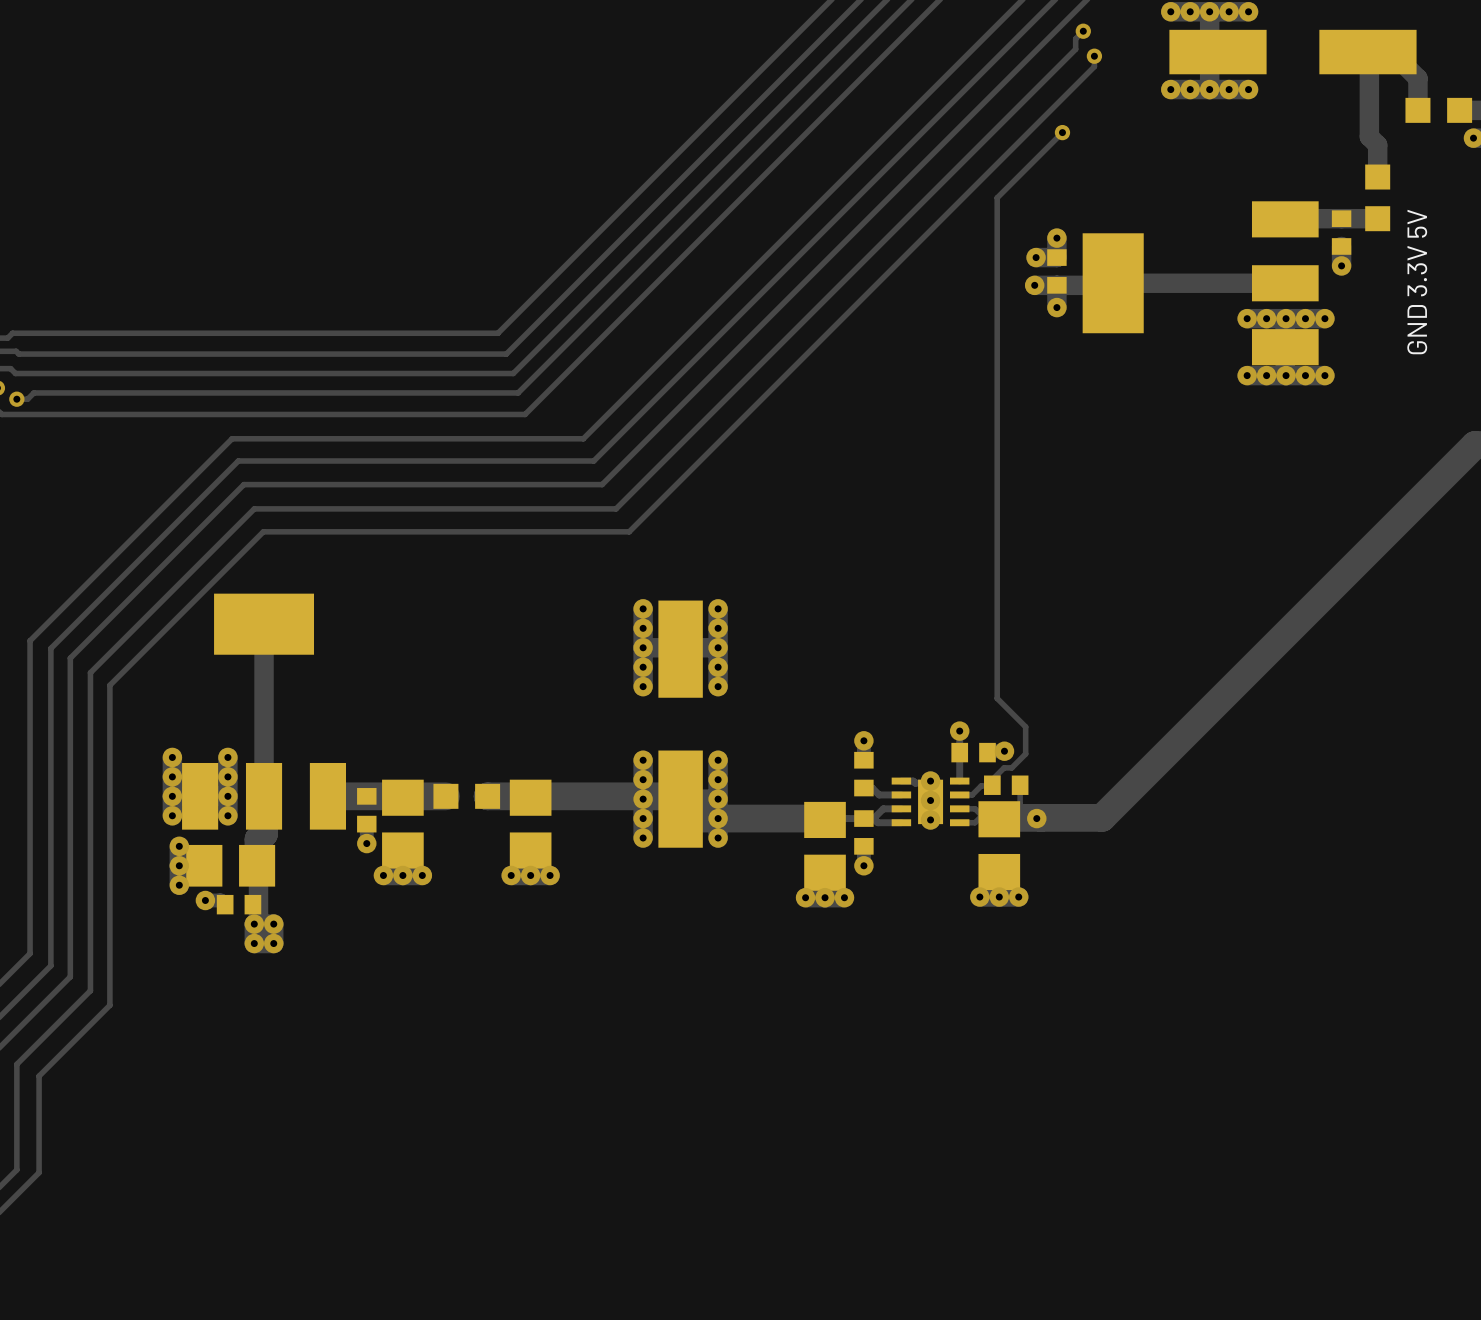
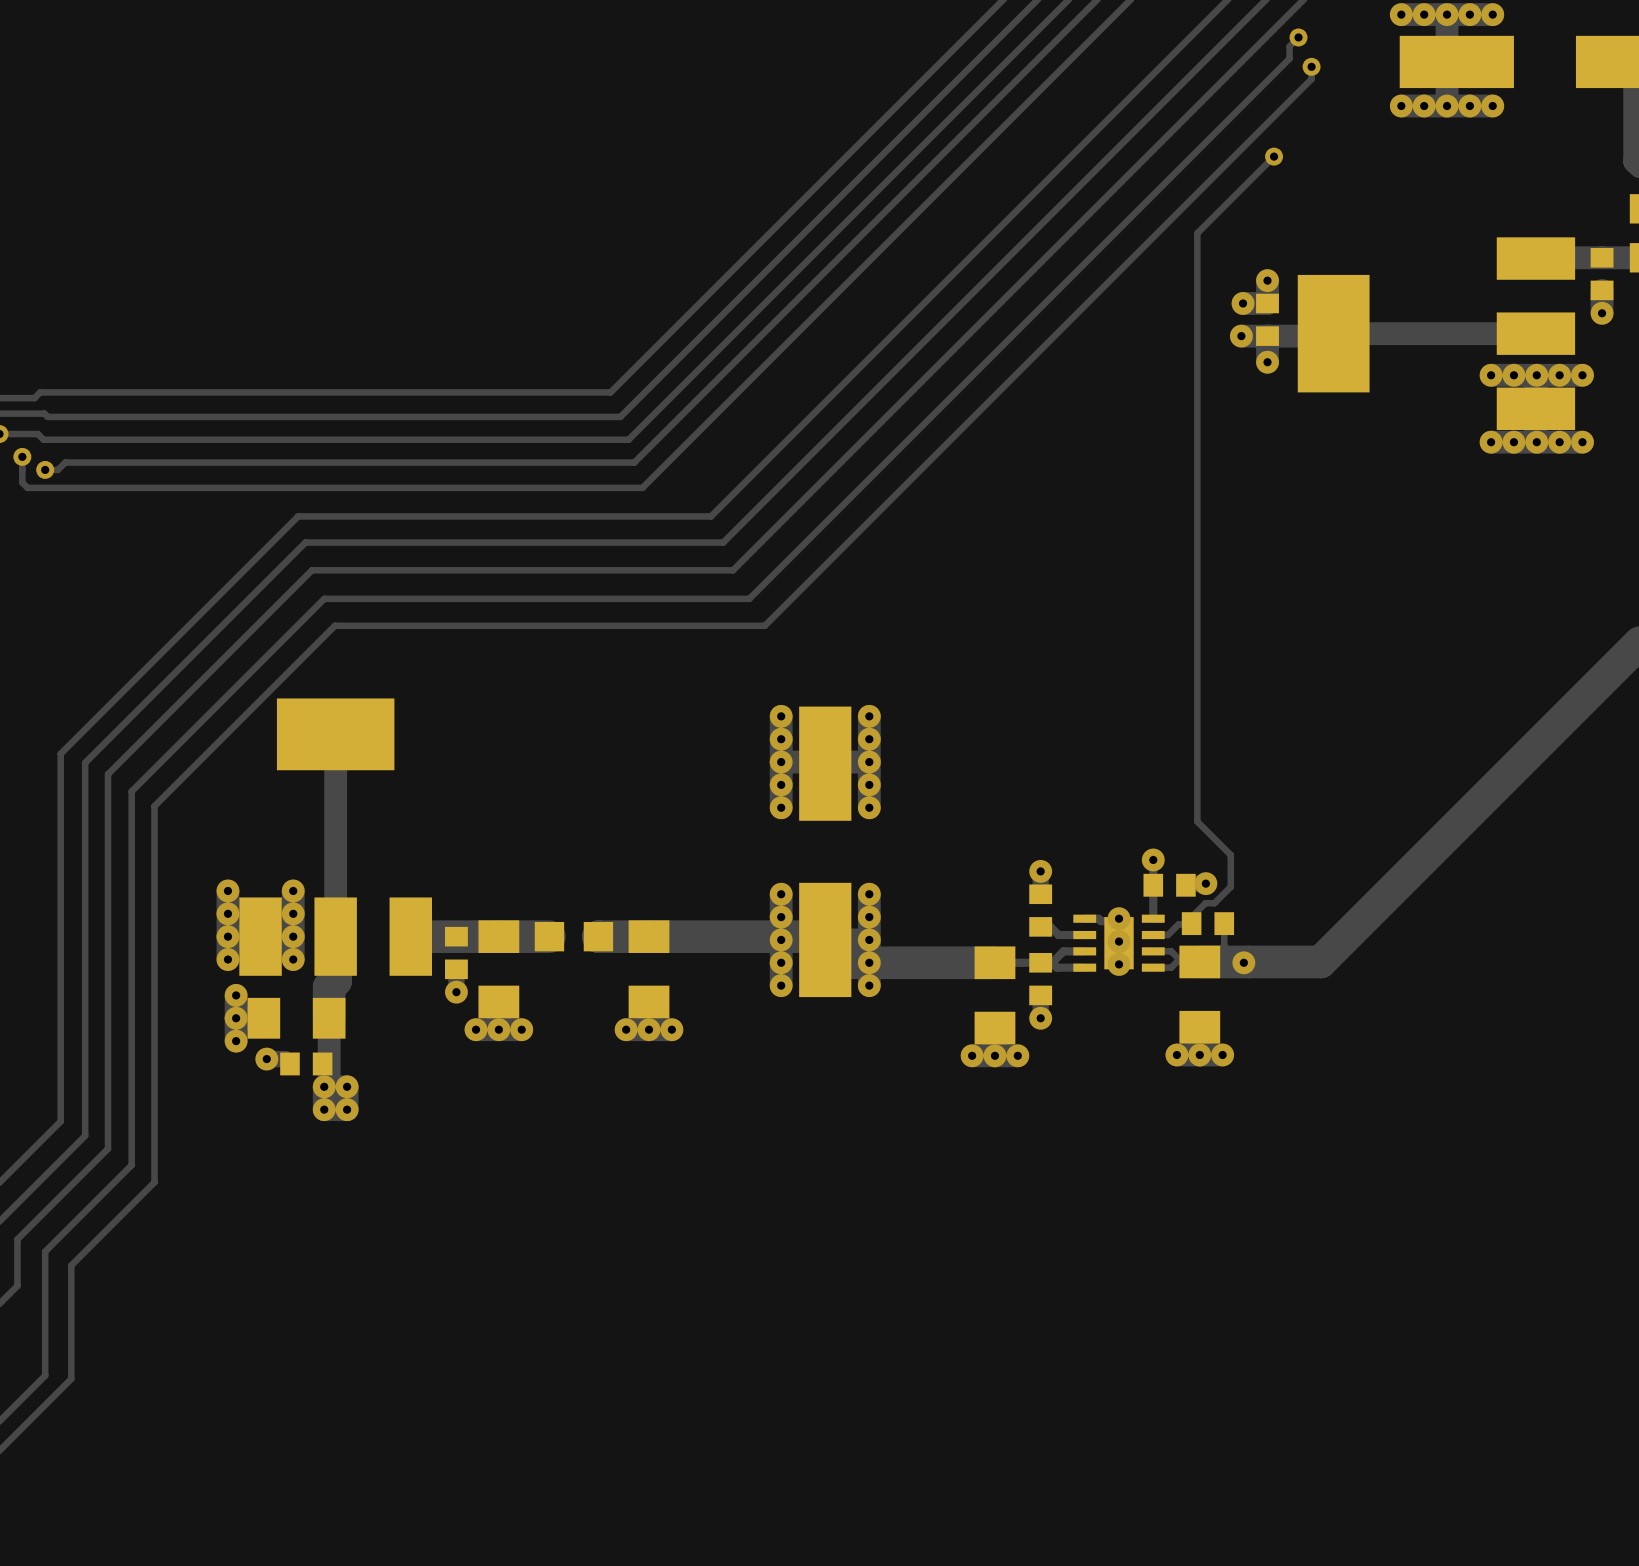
part footprint: [382, 779, 424, 869] -> [478, 920, 520, 1019]
part footprint: [509, 779, 552, 869] -> [628, 920, 670, 1019]
part footprint: [804, 801, 846, 891] -> [974, 946, 1016, 1045]
part footprint: [978, 801, 1021, 891] -> [1179, 945, 1221, 1044]
part footprint: [186, 844, 276, 887] -> [247, 997, 346, 1039]

